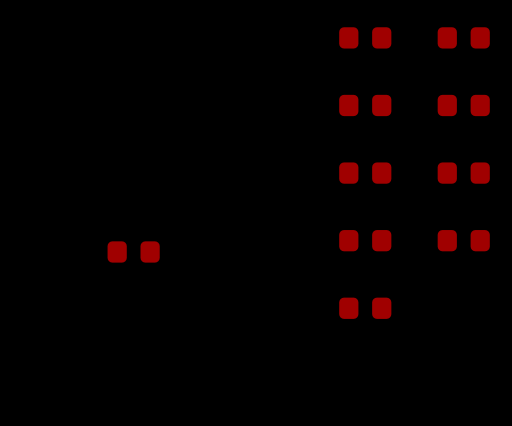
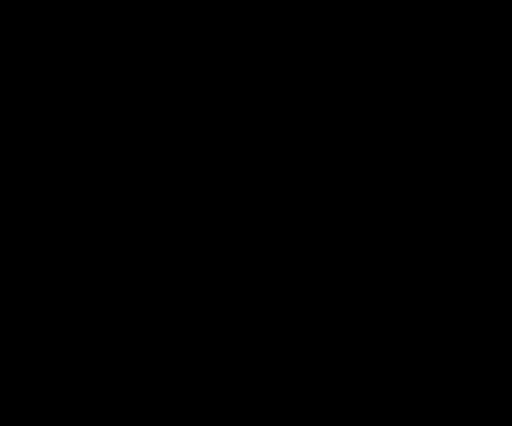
part: (365, 37) -> none
part: (463, 37) -> none
part: (365, 105) -> none
part: (463, 105) -> none
part: (365, 173) -> none
part: (463, 173) -> none
part: (365, 240) -> none
part: (463, 240) -> none
part: (133, 251) -> none
part: (365, 308) -> none

